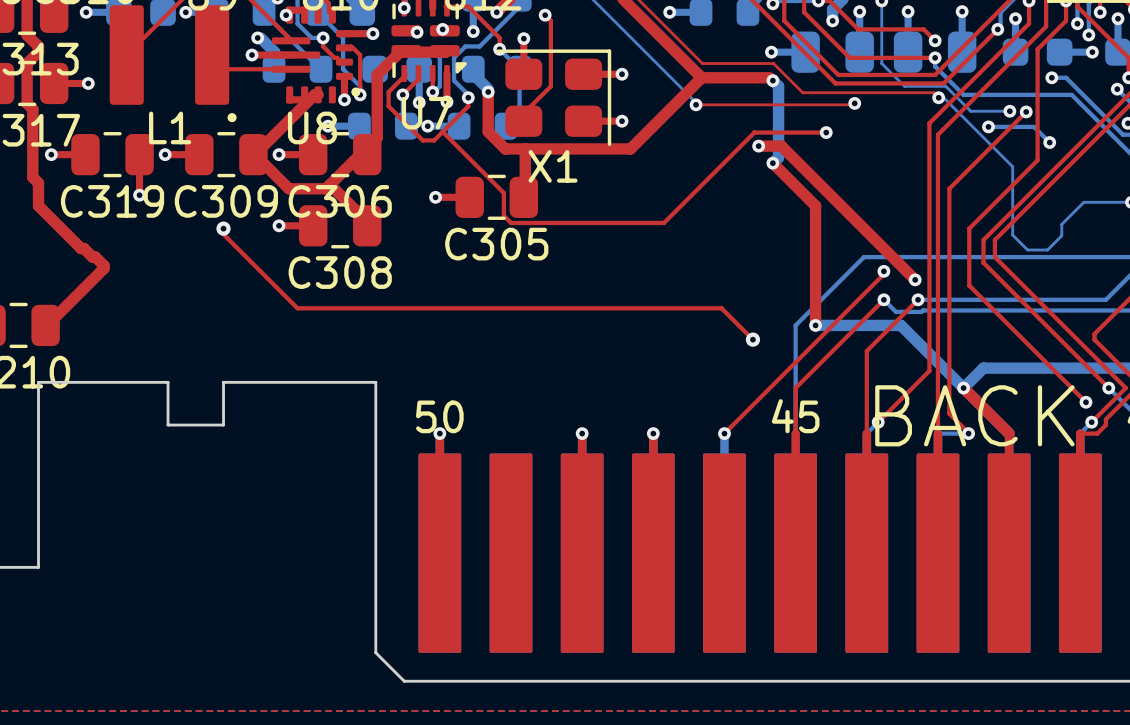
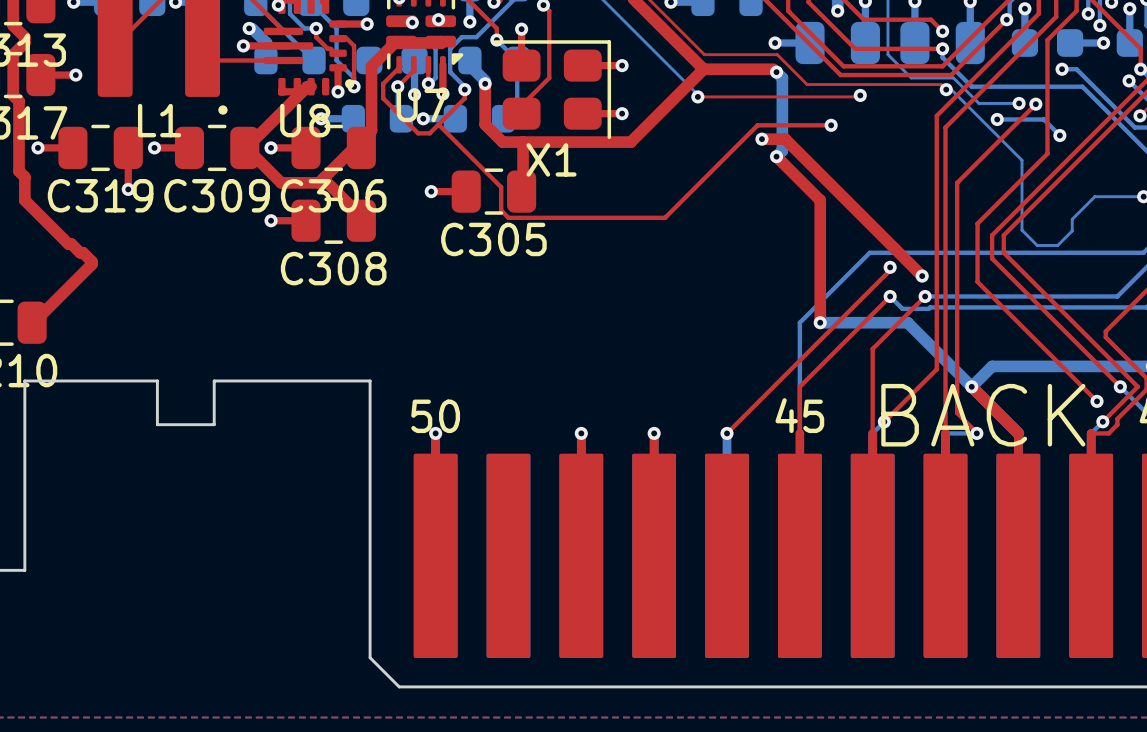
via: (223, 228) -> none
top track: (223, 234) (297, 308) (721, 308) (752, 339) -> none
via: (752, 339) -> none

